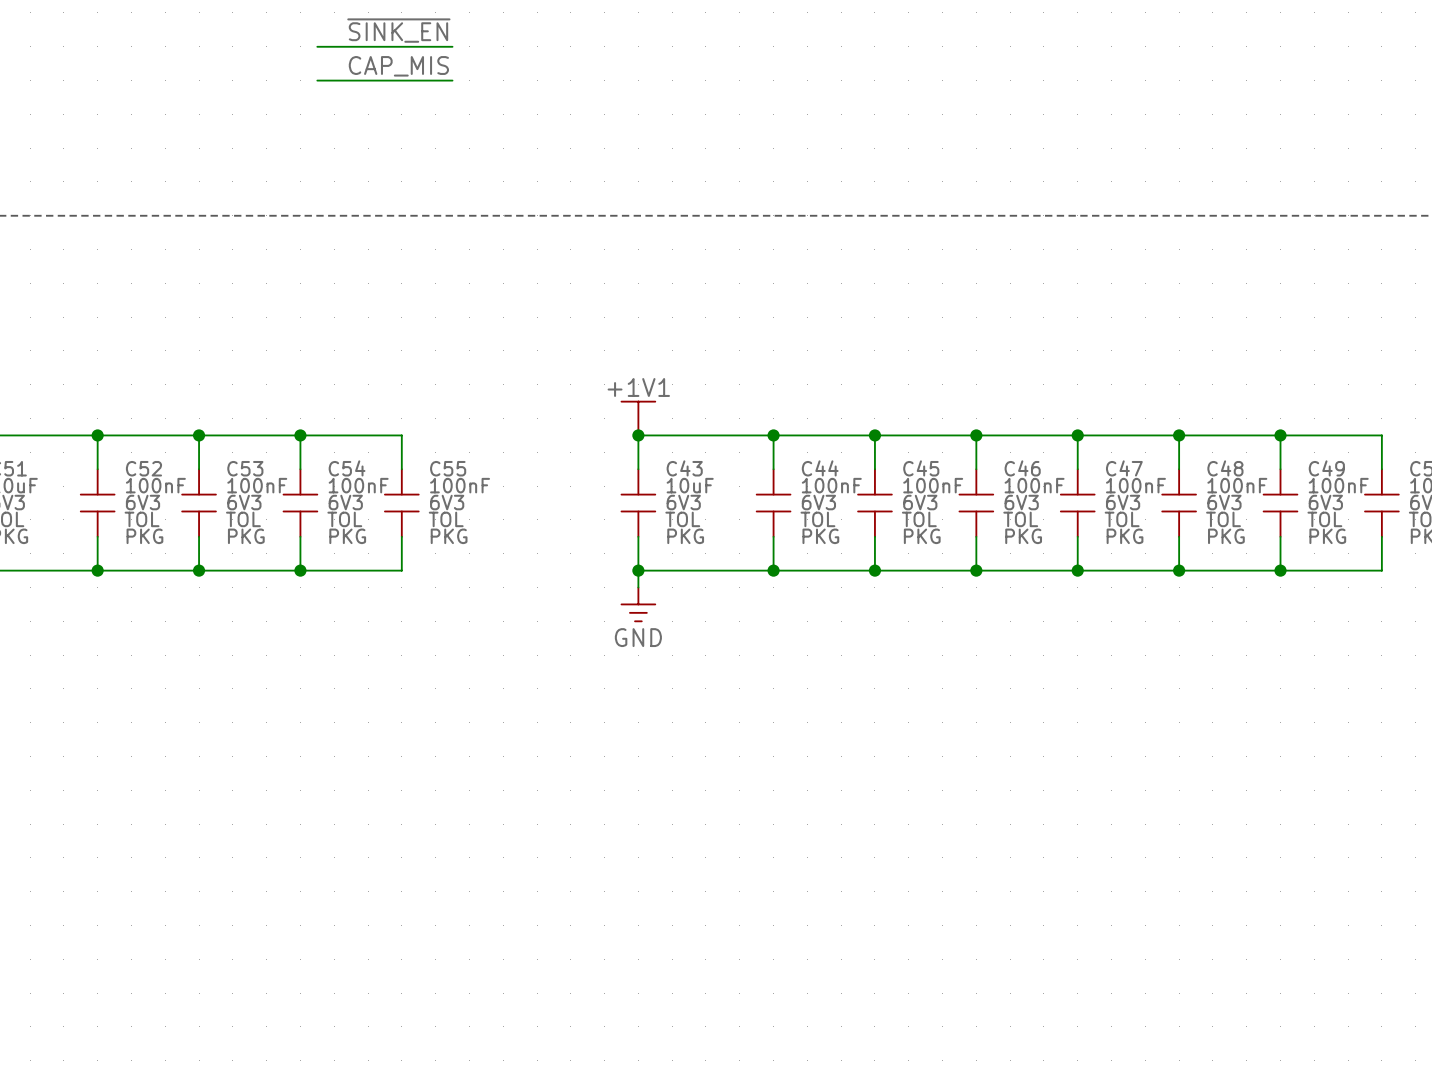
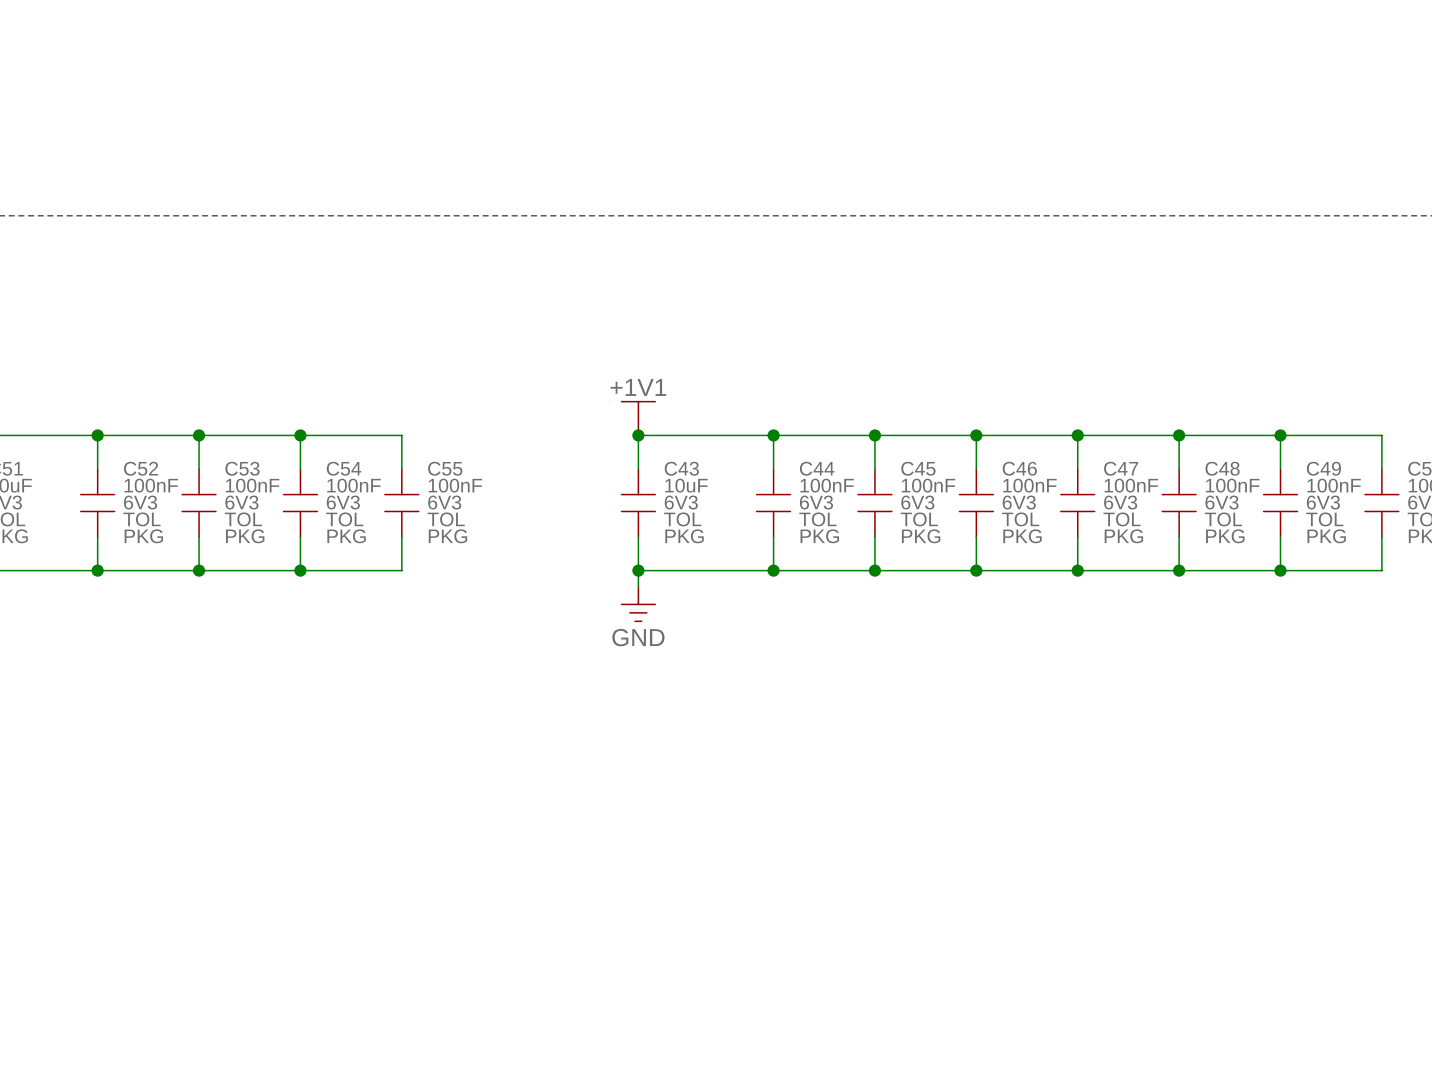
label: ~{SINK_EN} (398, 30) -> none
wire: (317, 46) (452, 46) -> none
label: CAP_MIS (398, 66) -> none
wire: (317, 80) (452, 80) -> none

